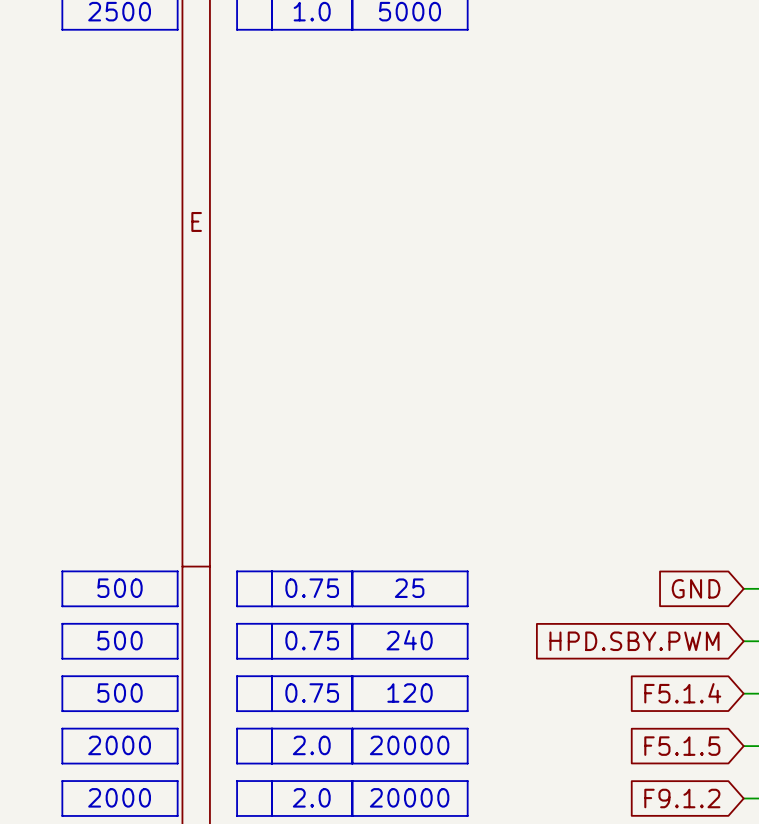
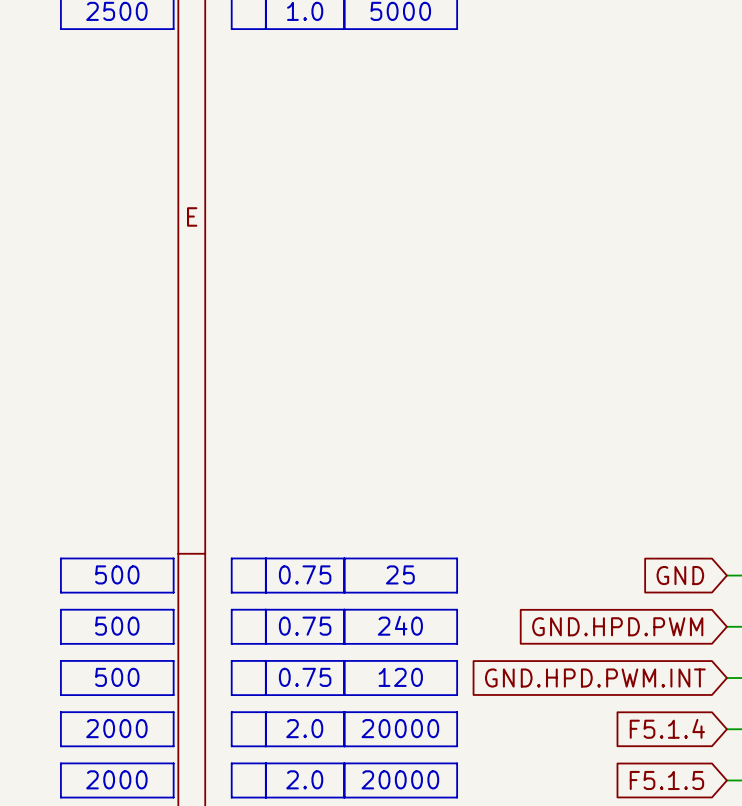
global label: HPD.SBY.PWM (634, 641) -> GND.HPD.PWM (617, 626)
global label: F5.1.4 (682, 693) -> GND.HPD.PWM.INT (595, 678)
global label: F5.1.5 (682, 746) -> F5.1.4 (667, 728)
global label: F9.1.2 (682, 798) -> F5.1.5 (666, 780)

